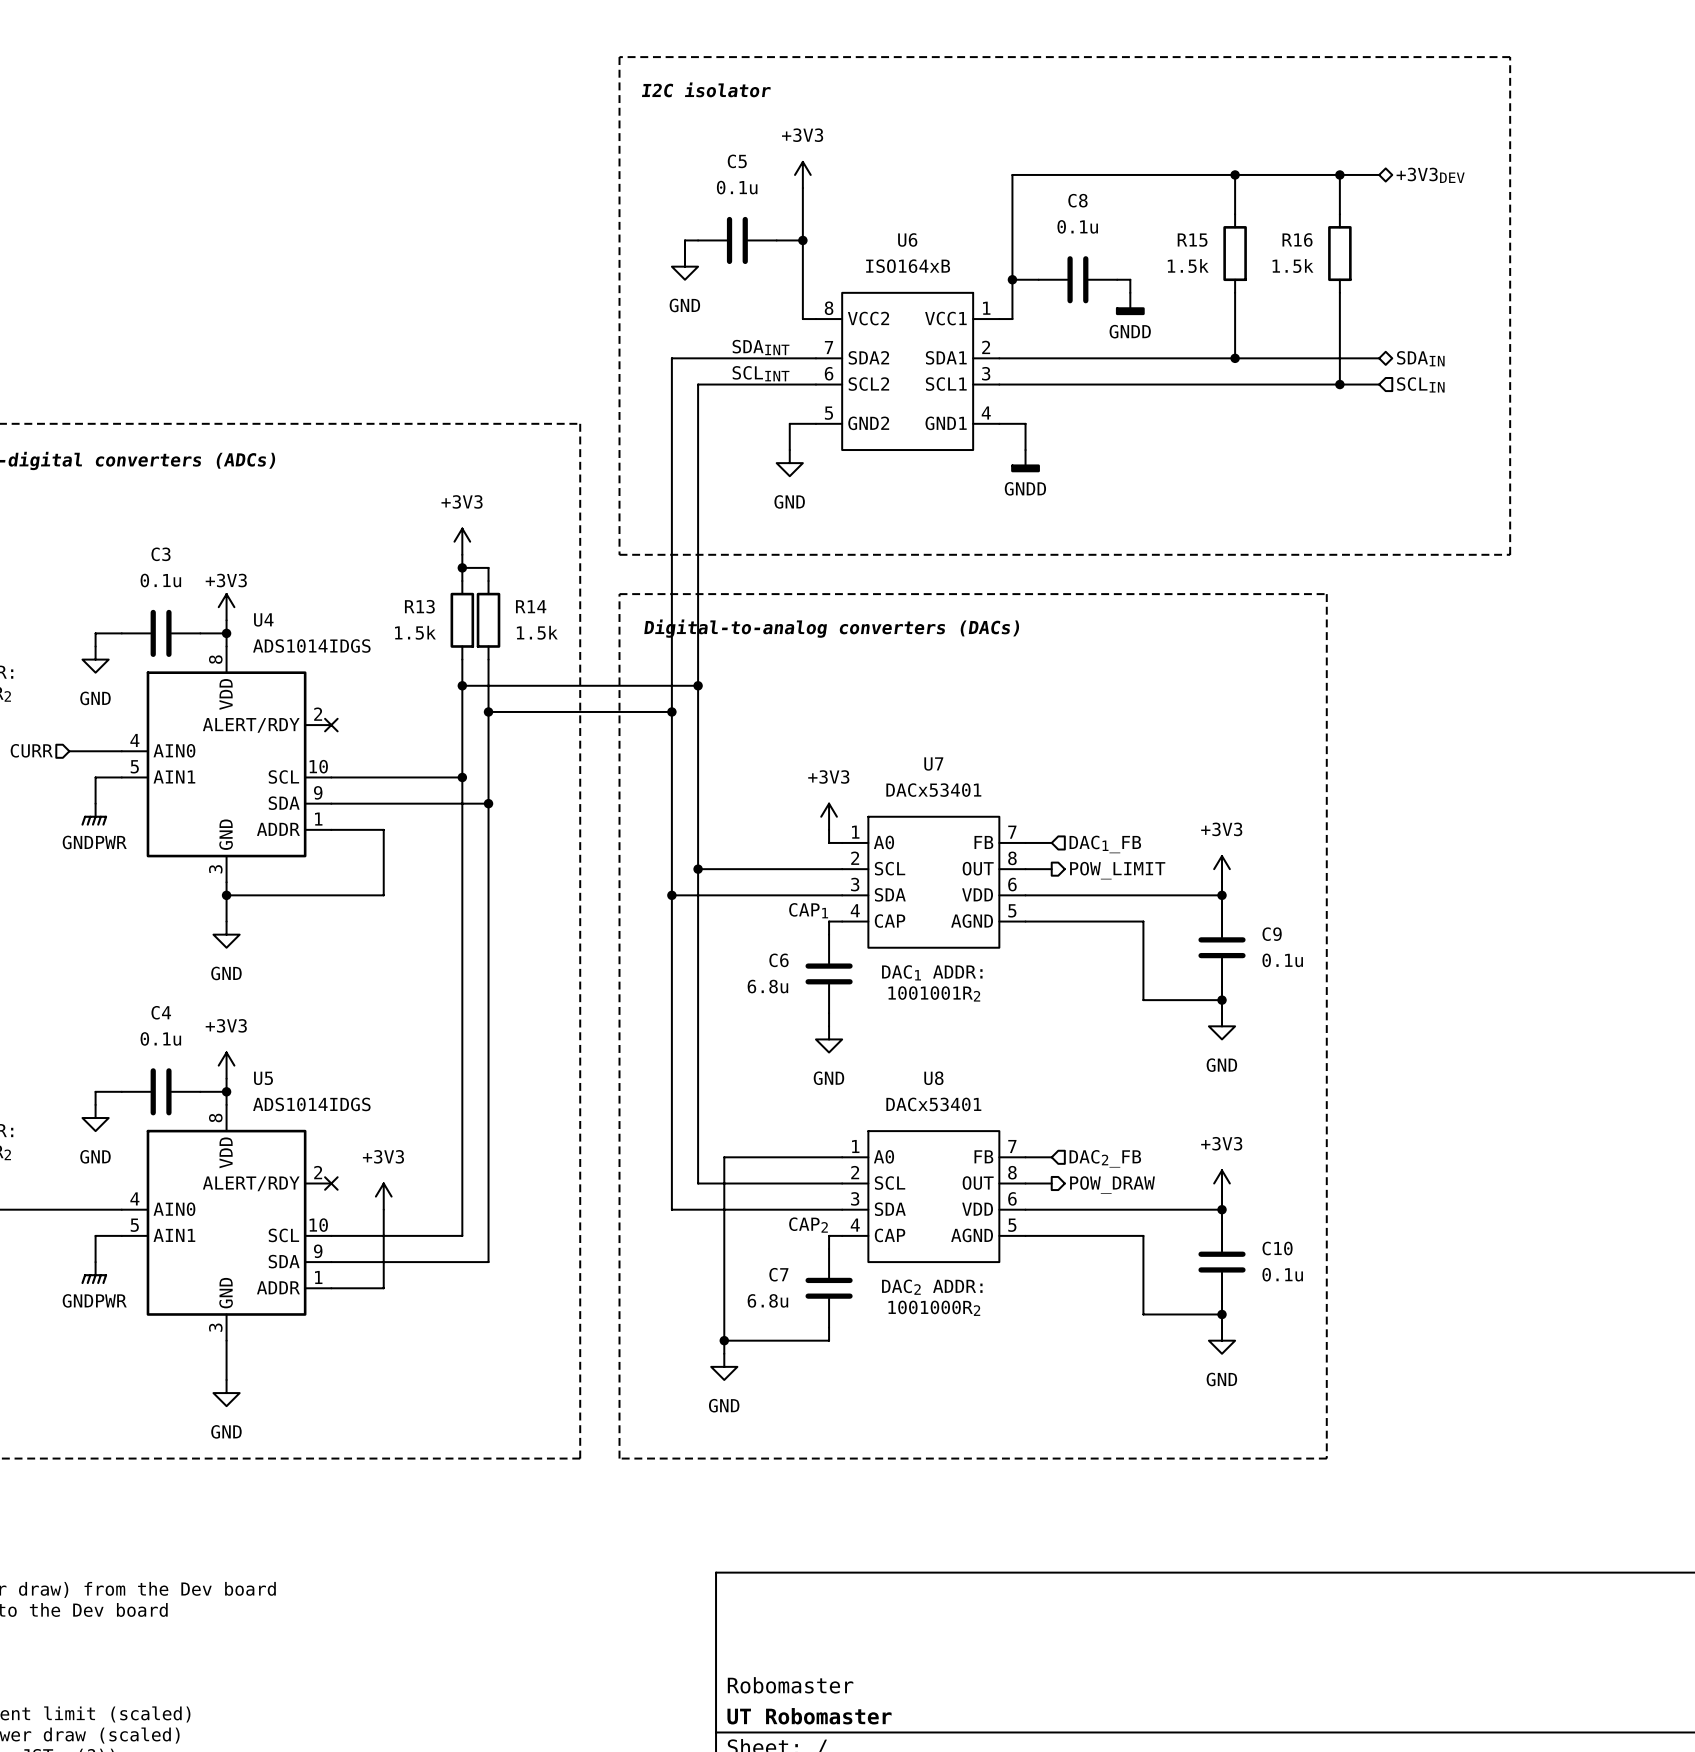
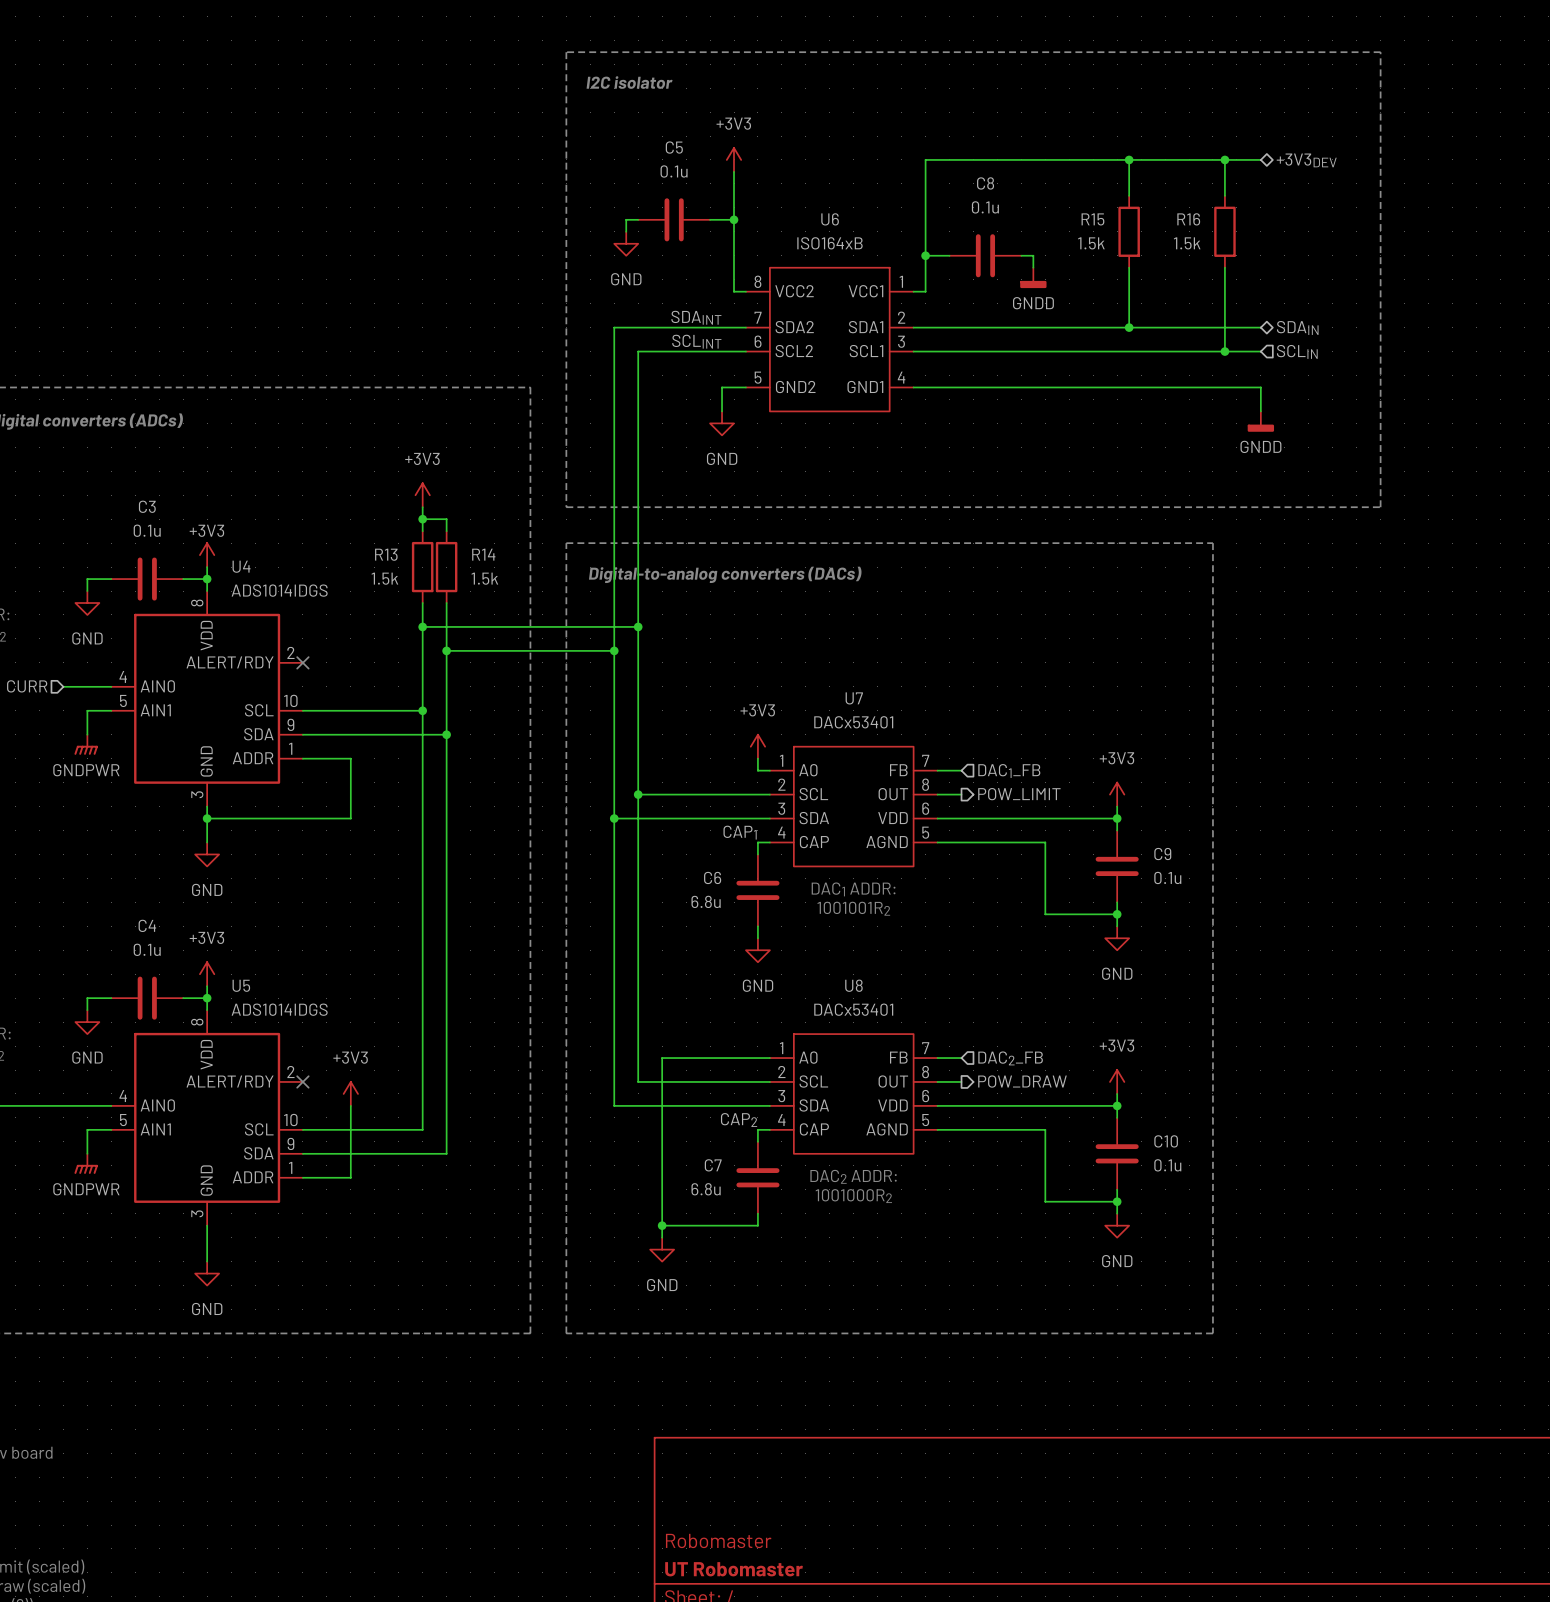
wire: (1025, 423) (1025, 450) -> (937, 387) (1260, 387) (1260, 411)
power symbol: GNDD (1025, 461) -> none
power symbol: none -> GNDD (1260, 421)

